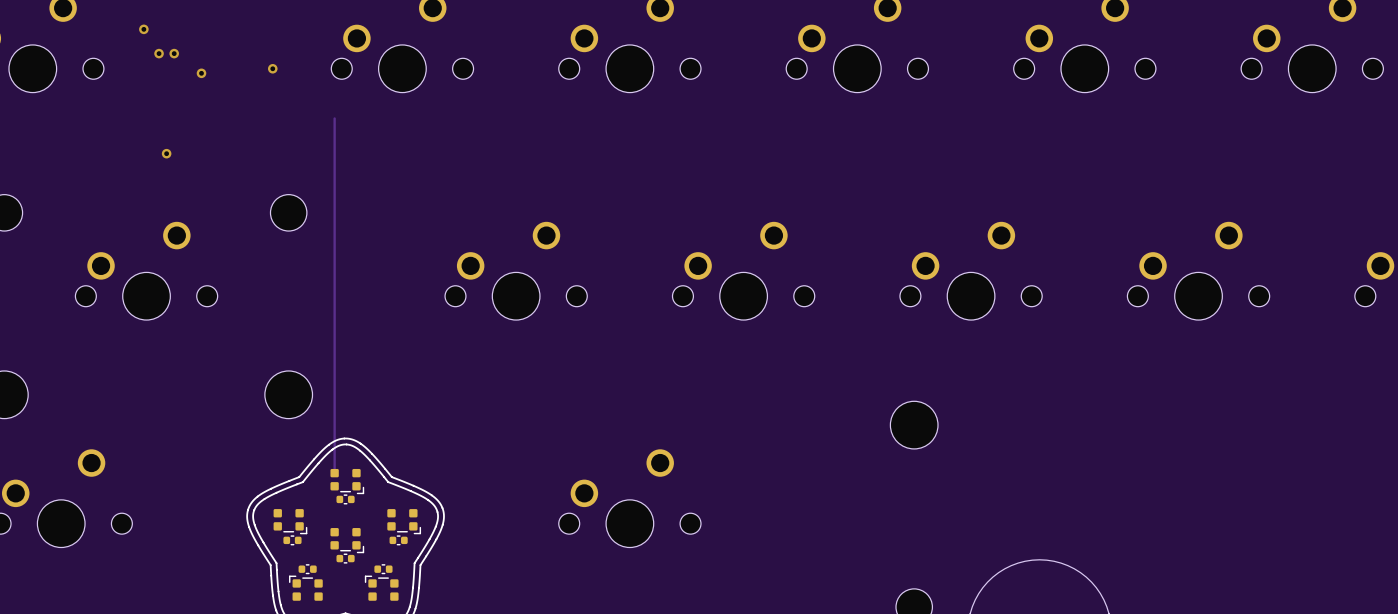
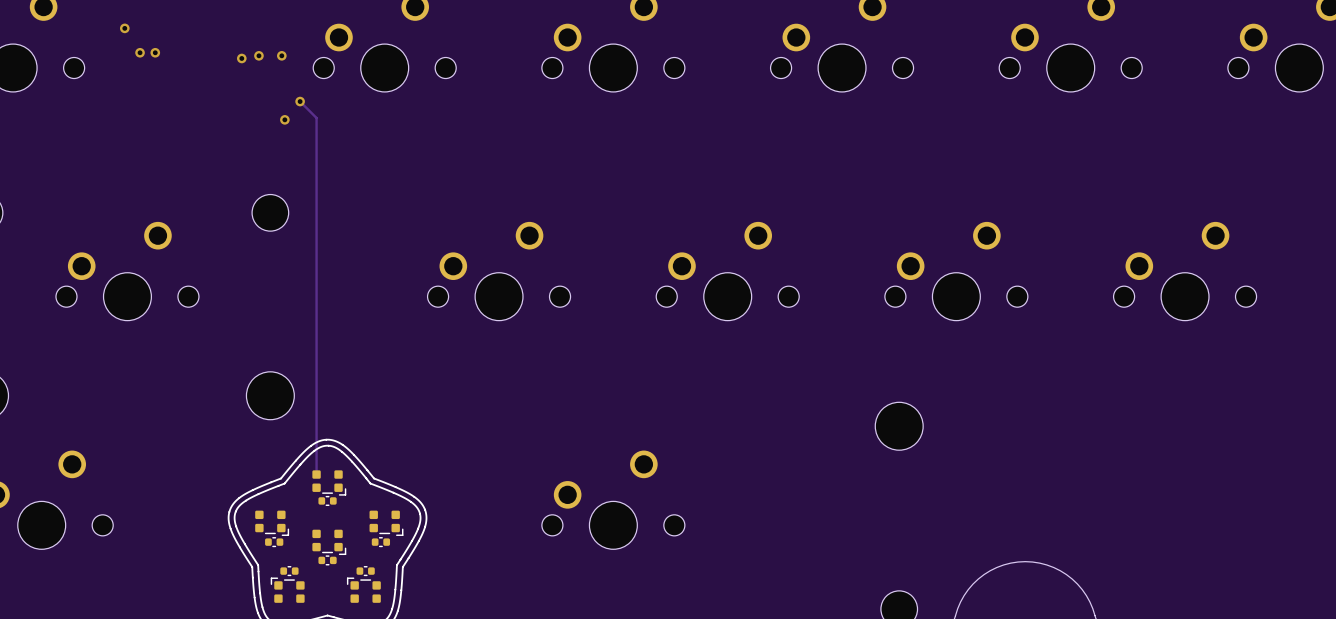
via: none -> (258, 55)
via: none -> (281, 55)
via: none -> (241, 58)
via: (272, 68) -> none
via: (201, 73) -> none
track: none -> (300, 101) (316, 118)
via: none -> (300, 101)
via: none -> (284, 119)
via: (166, 153) -> none

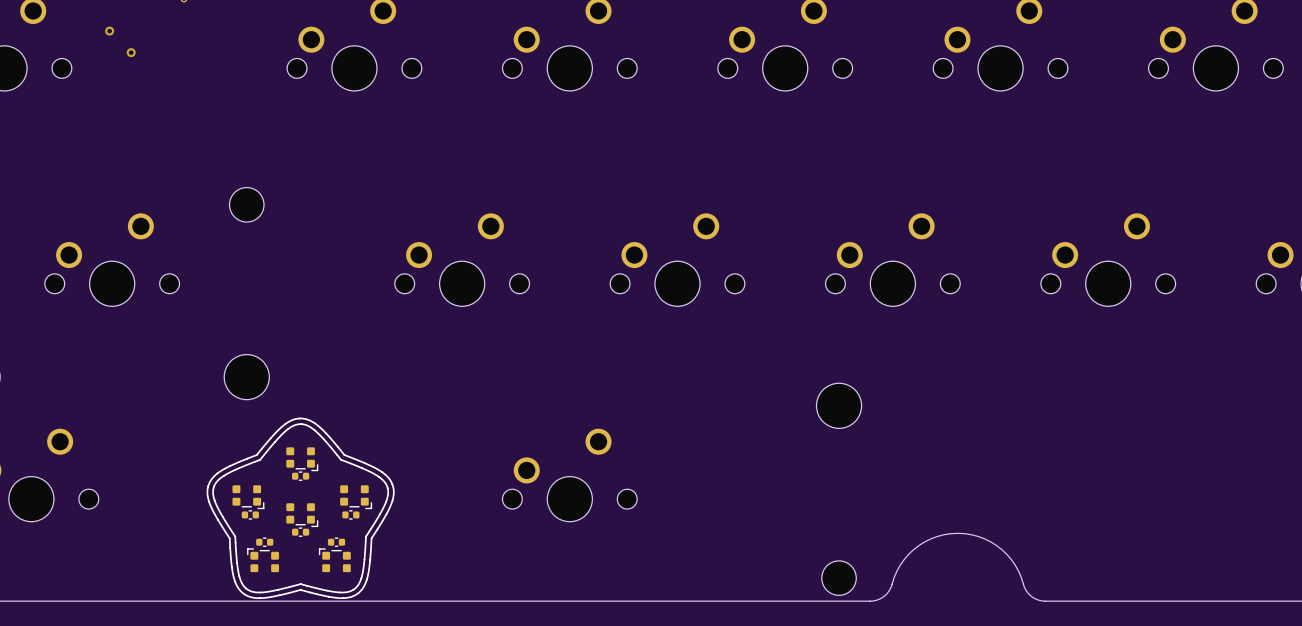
via: none -> (131, 52)
via: (140, 52) -> none
via: (155, 52) -> none
via: (258, 55) -> none
via: (281, 55) -> none
via: (241, 58) -> none
track: (300, 101) (316, 118) (316, 474) -> none
via: (300, 101) -> none
via: (284, 119) -> none

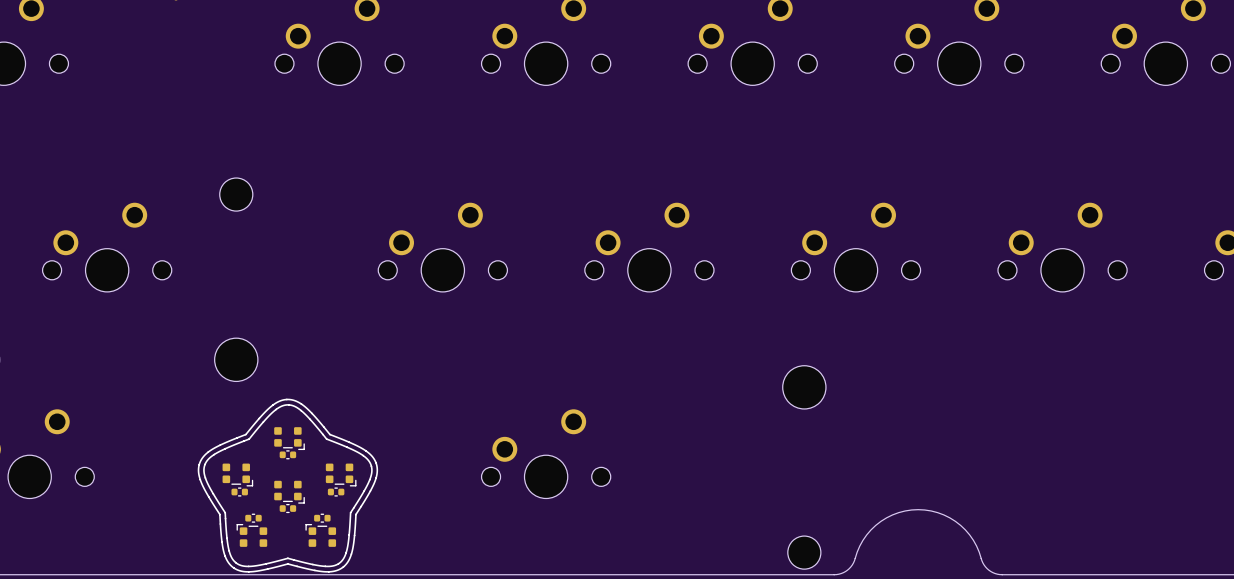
via: (109, 31) -> none
via: (131, 52) -> none

